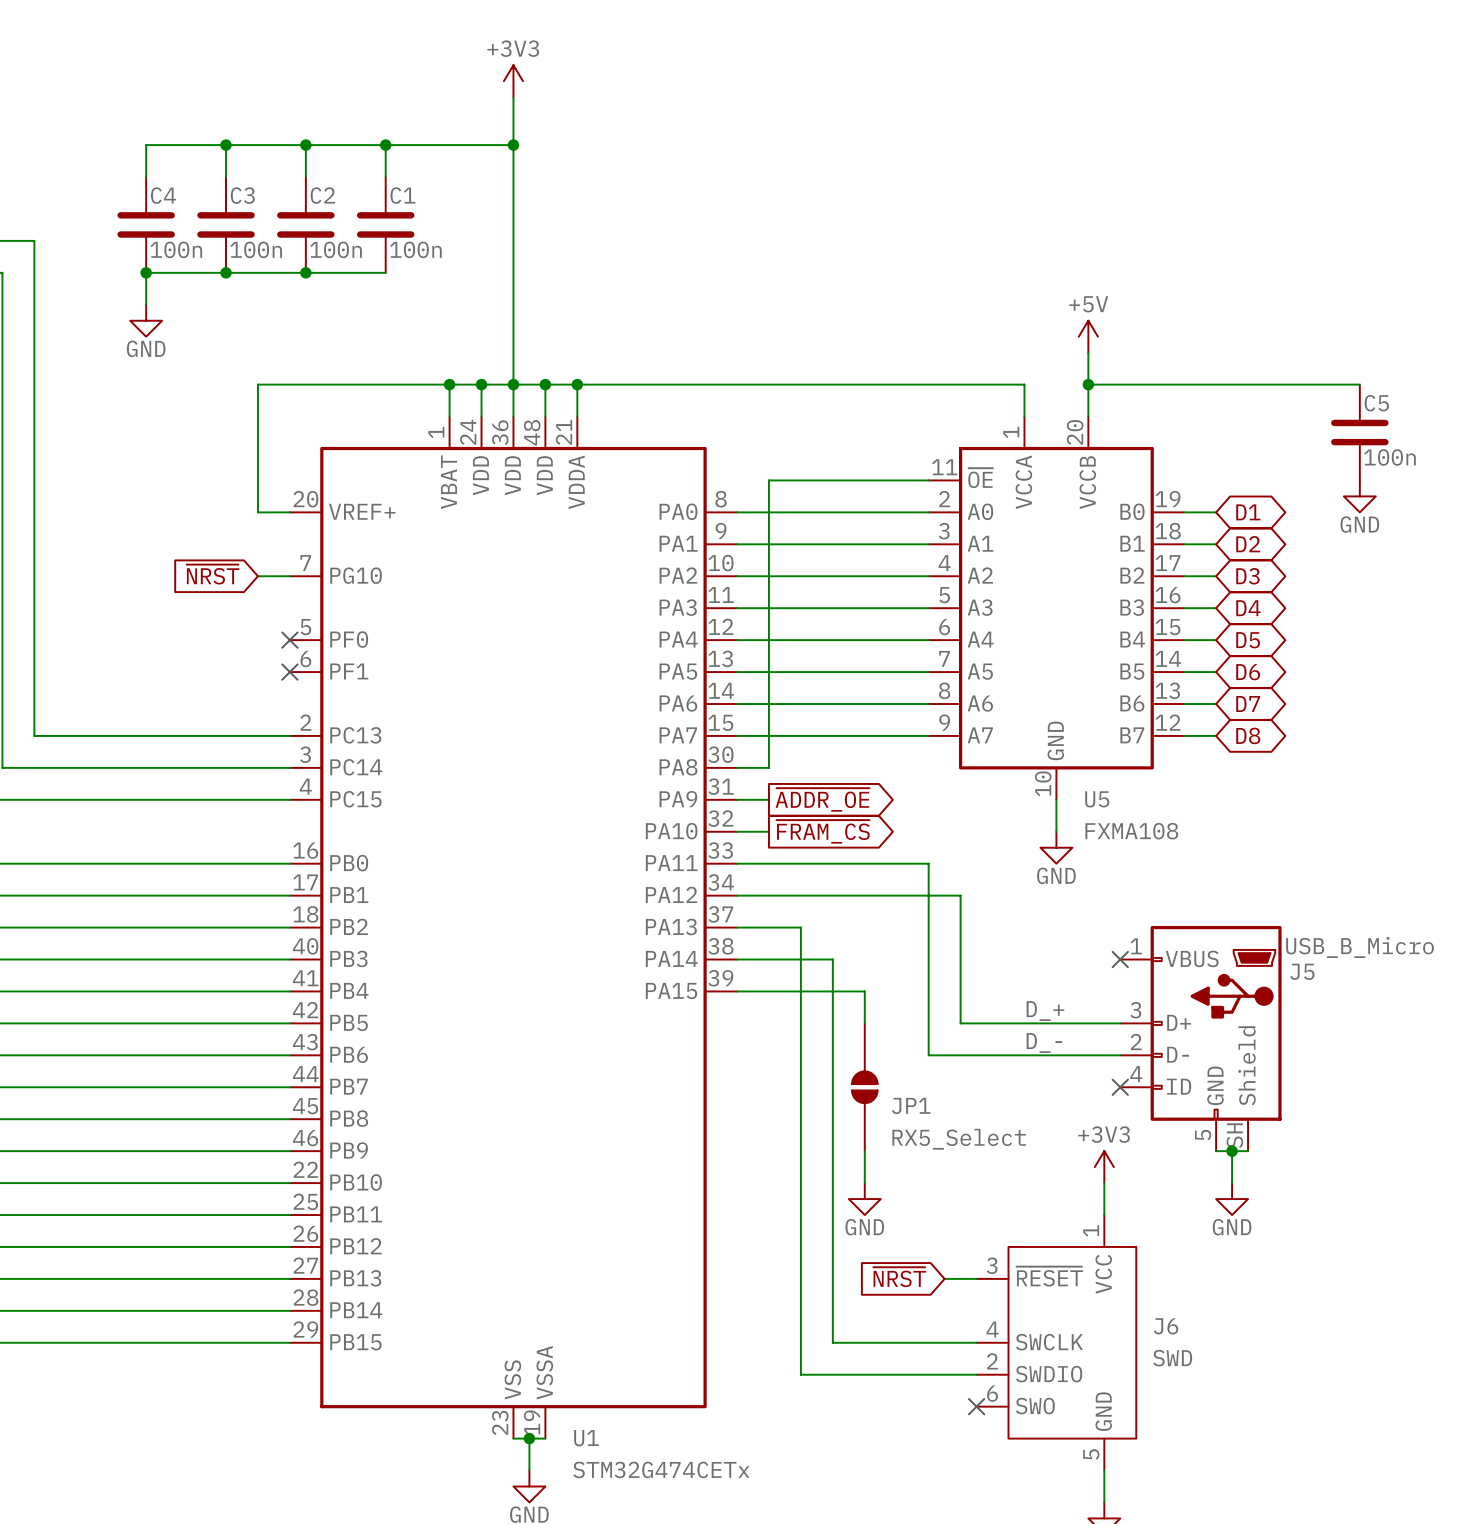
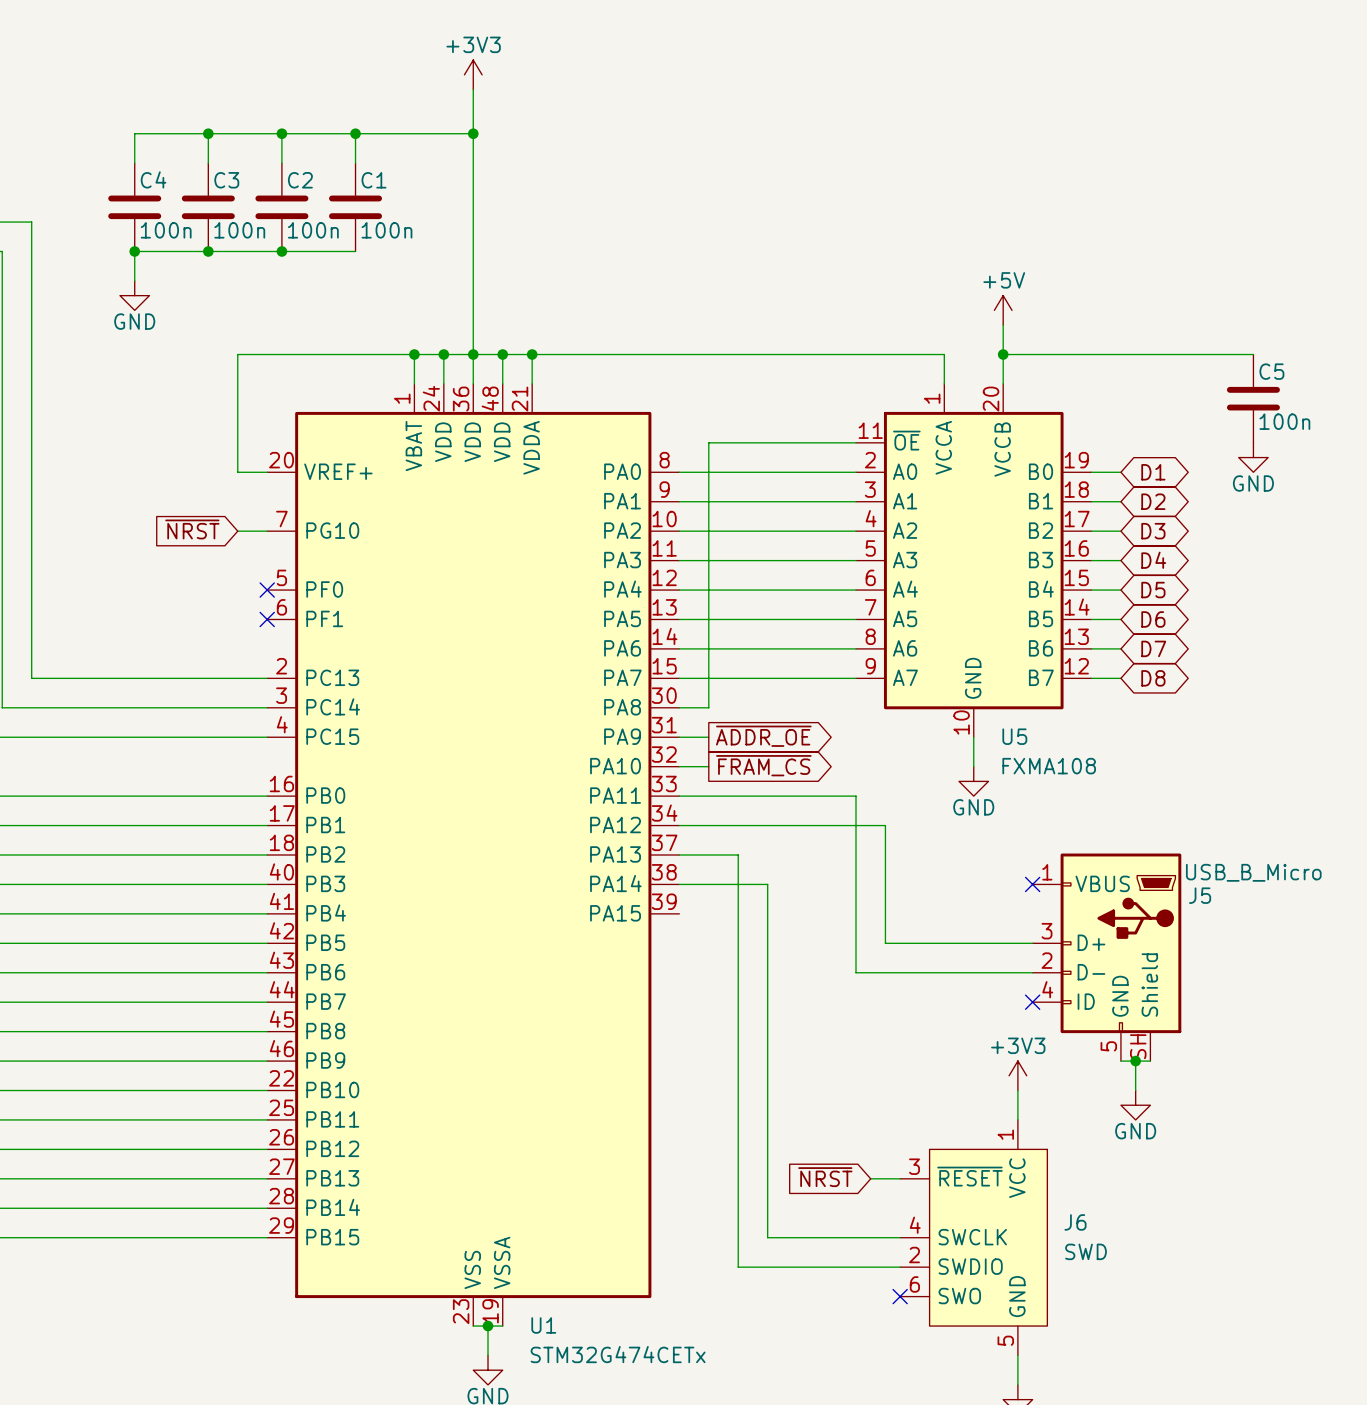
wire: (737, 991) (864, 991) (864, 1023) -> none
label: D_+ (1045, 1011) -> none
label: D_- (1044, 1043) -> none
JP1: RX5_Select (864, 1087) -> none
wire: (864, 1151) (864, 1183) -> none
power symbol: GND (864, 1199) -> none

